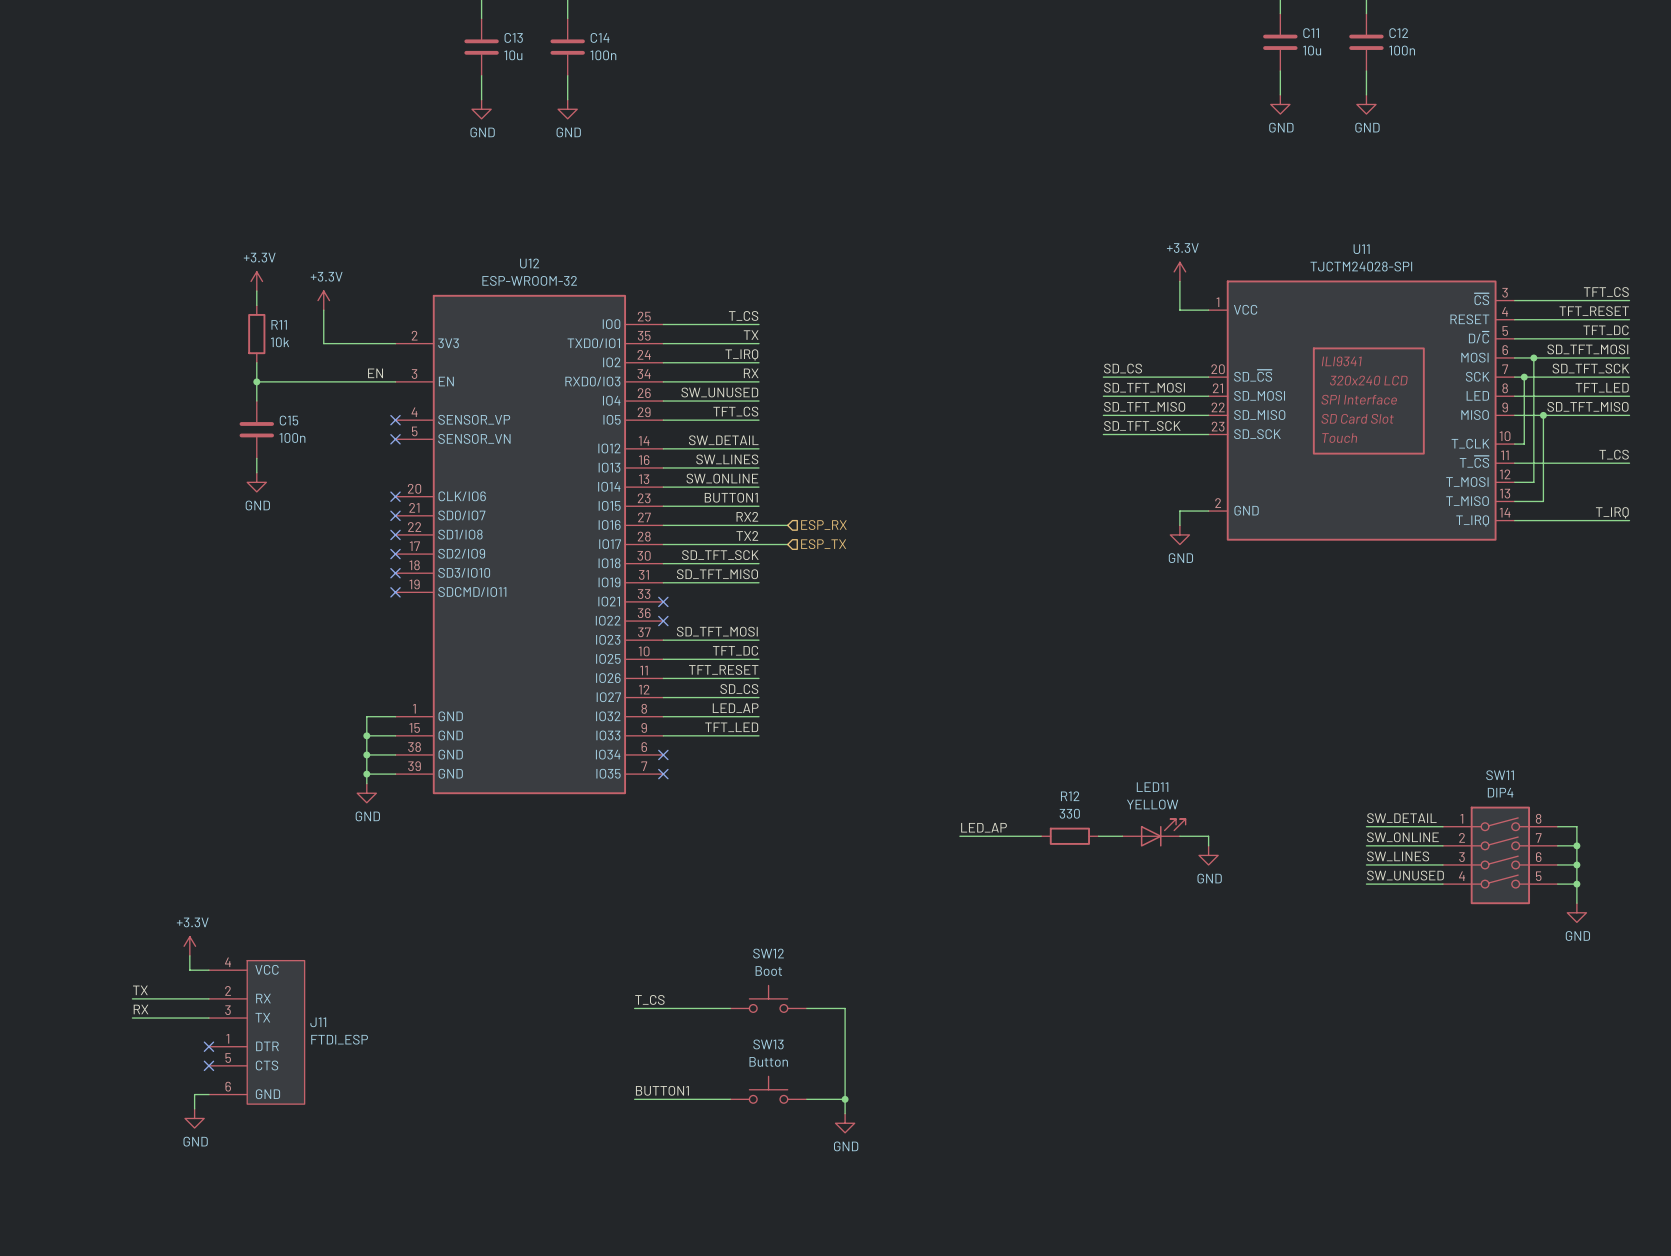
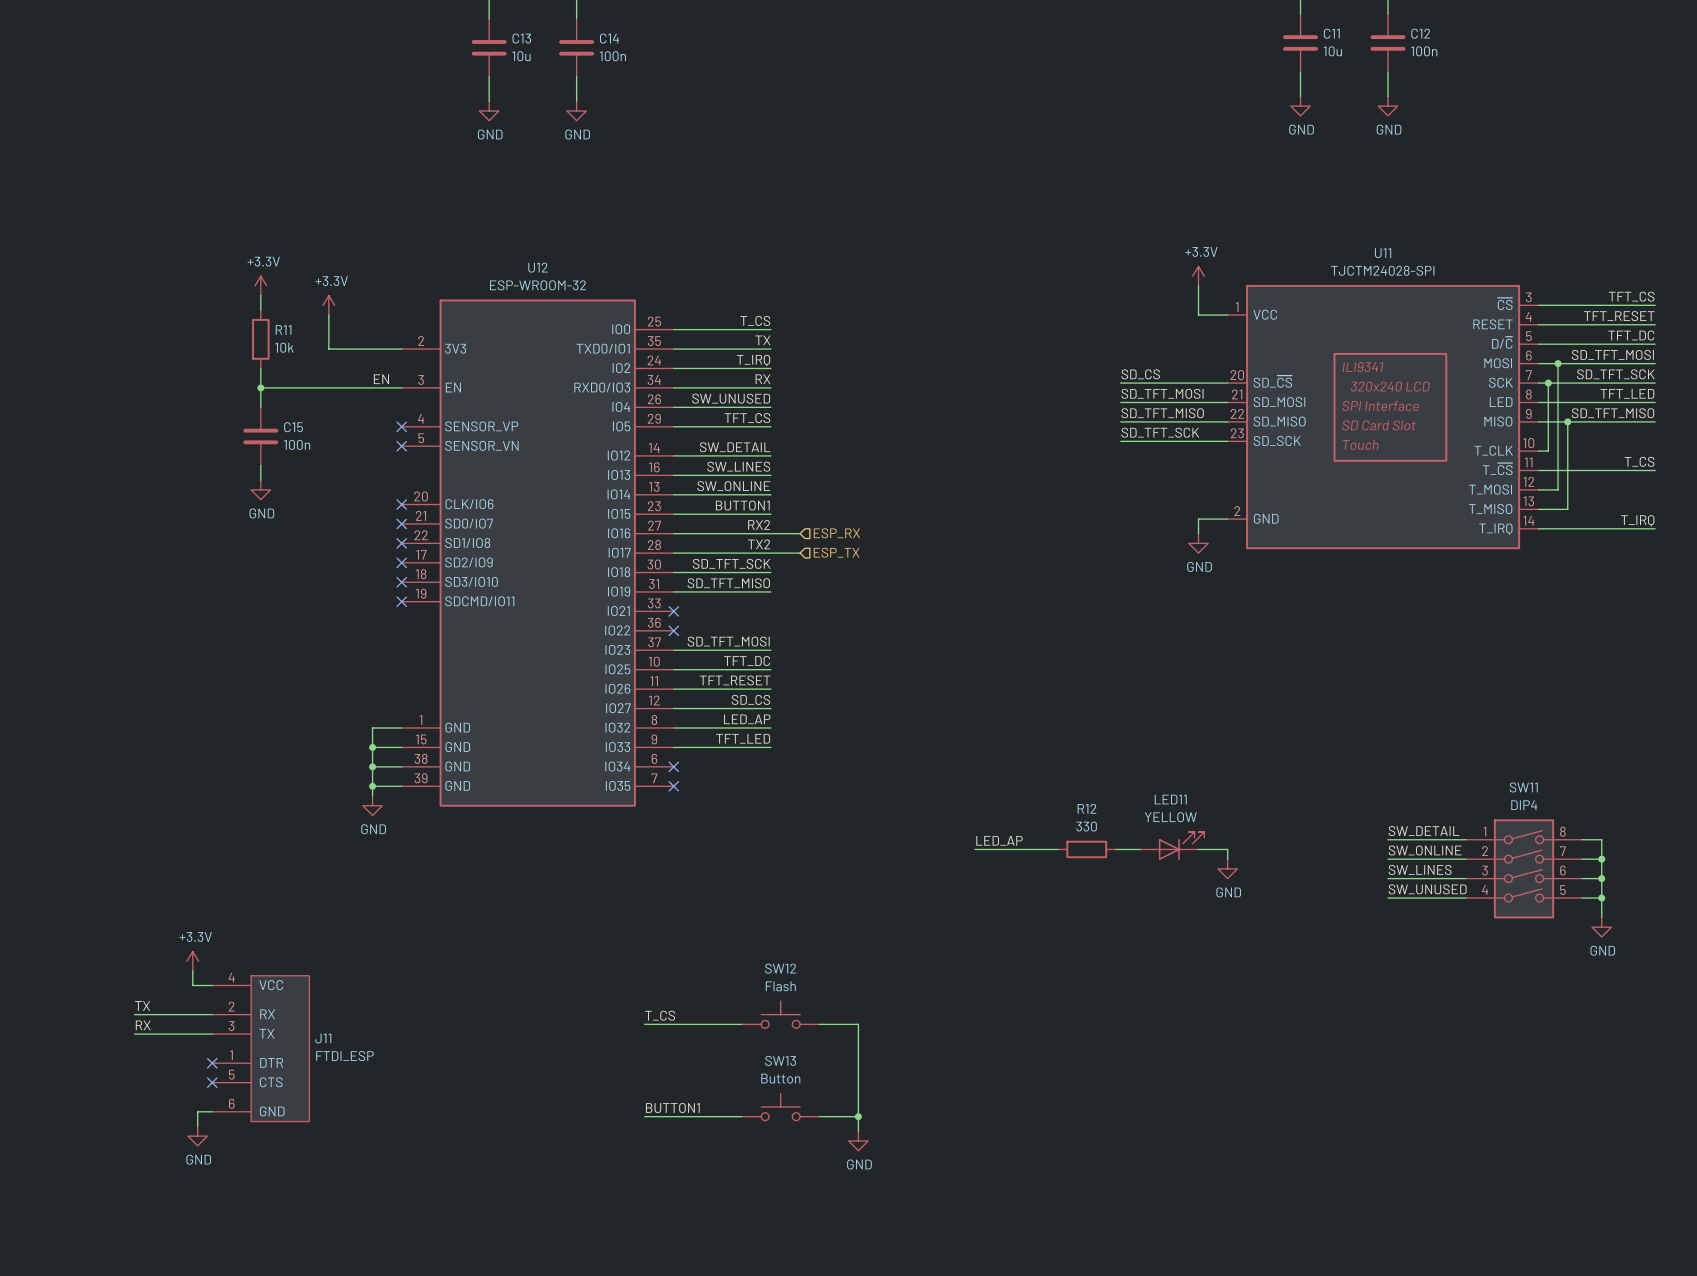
SW12 value: Boot (768, 971) -> Flash (780, 986)

